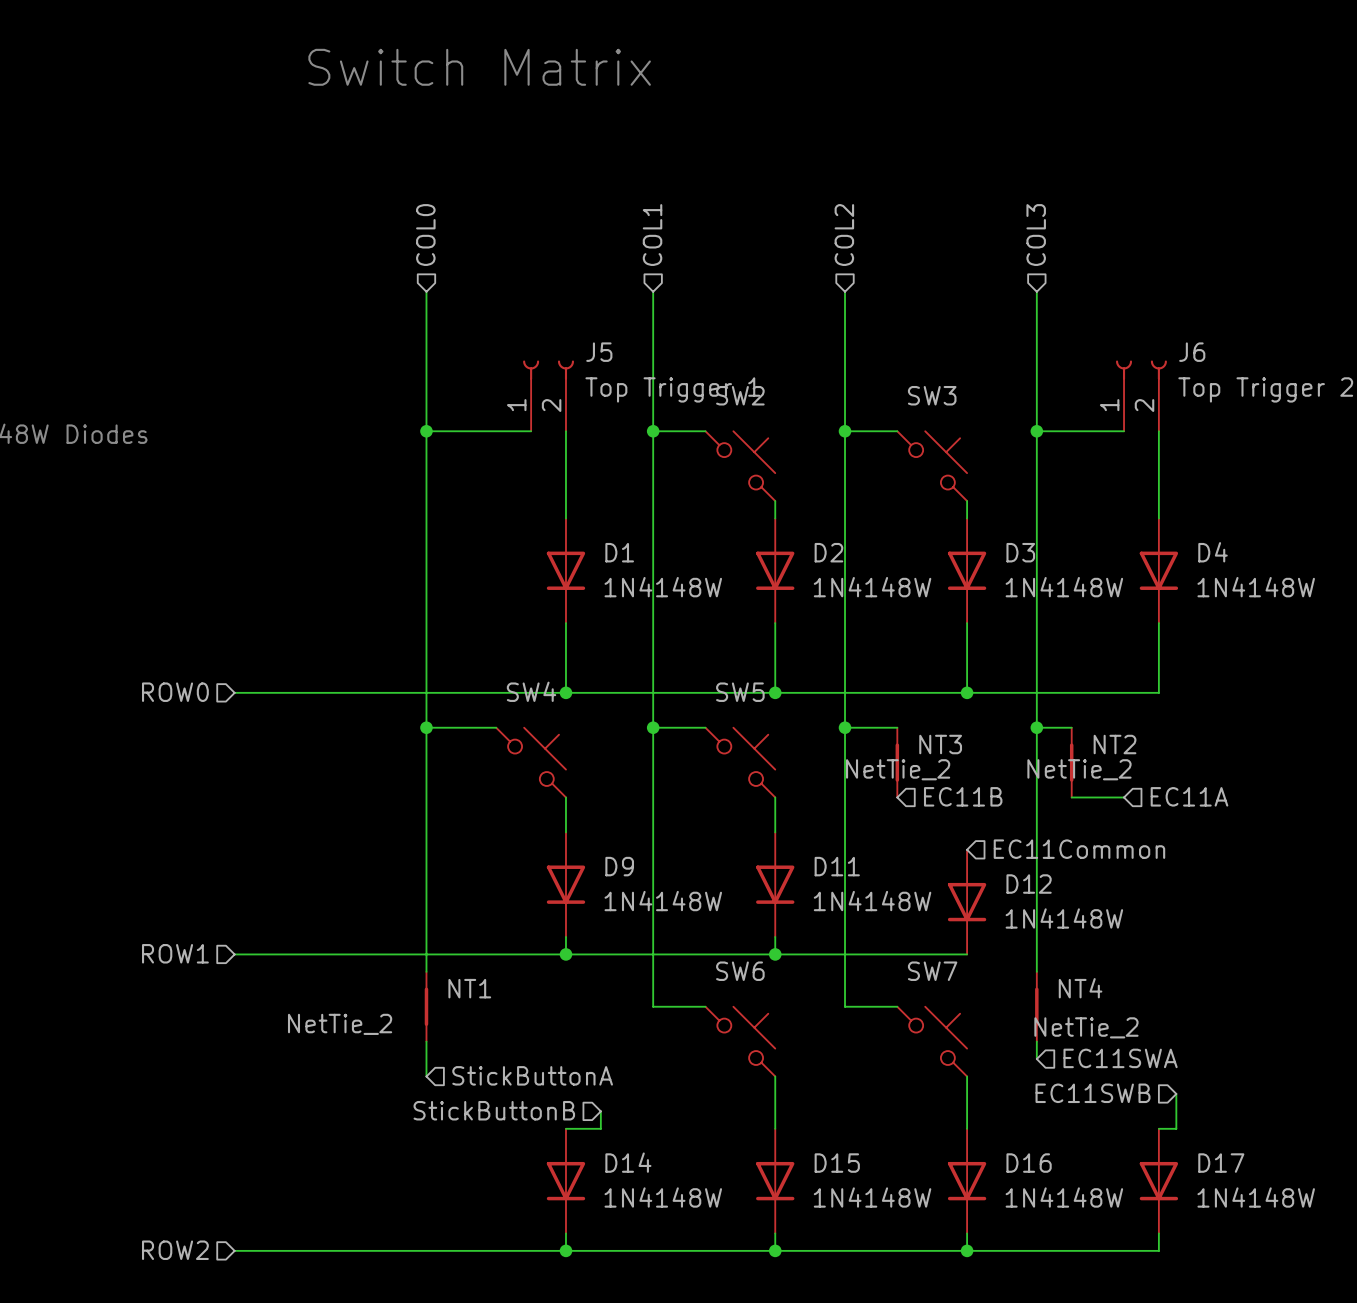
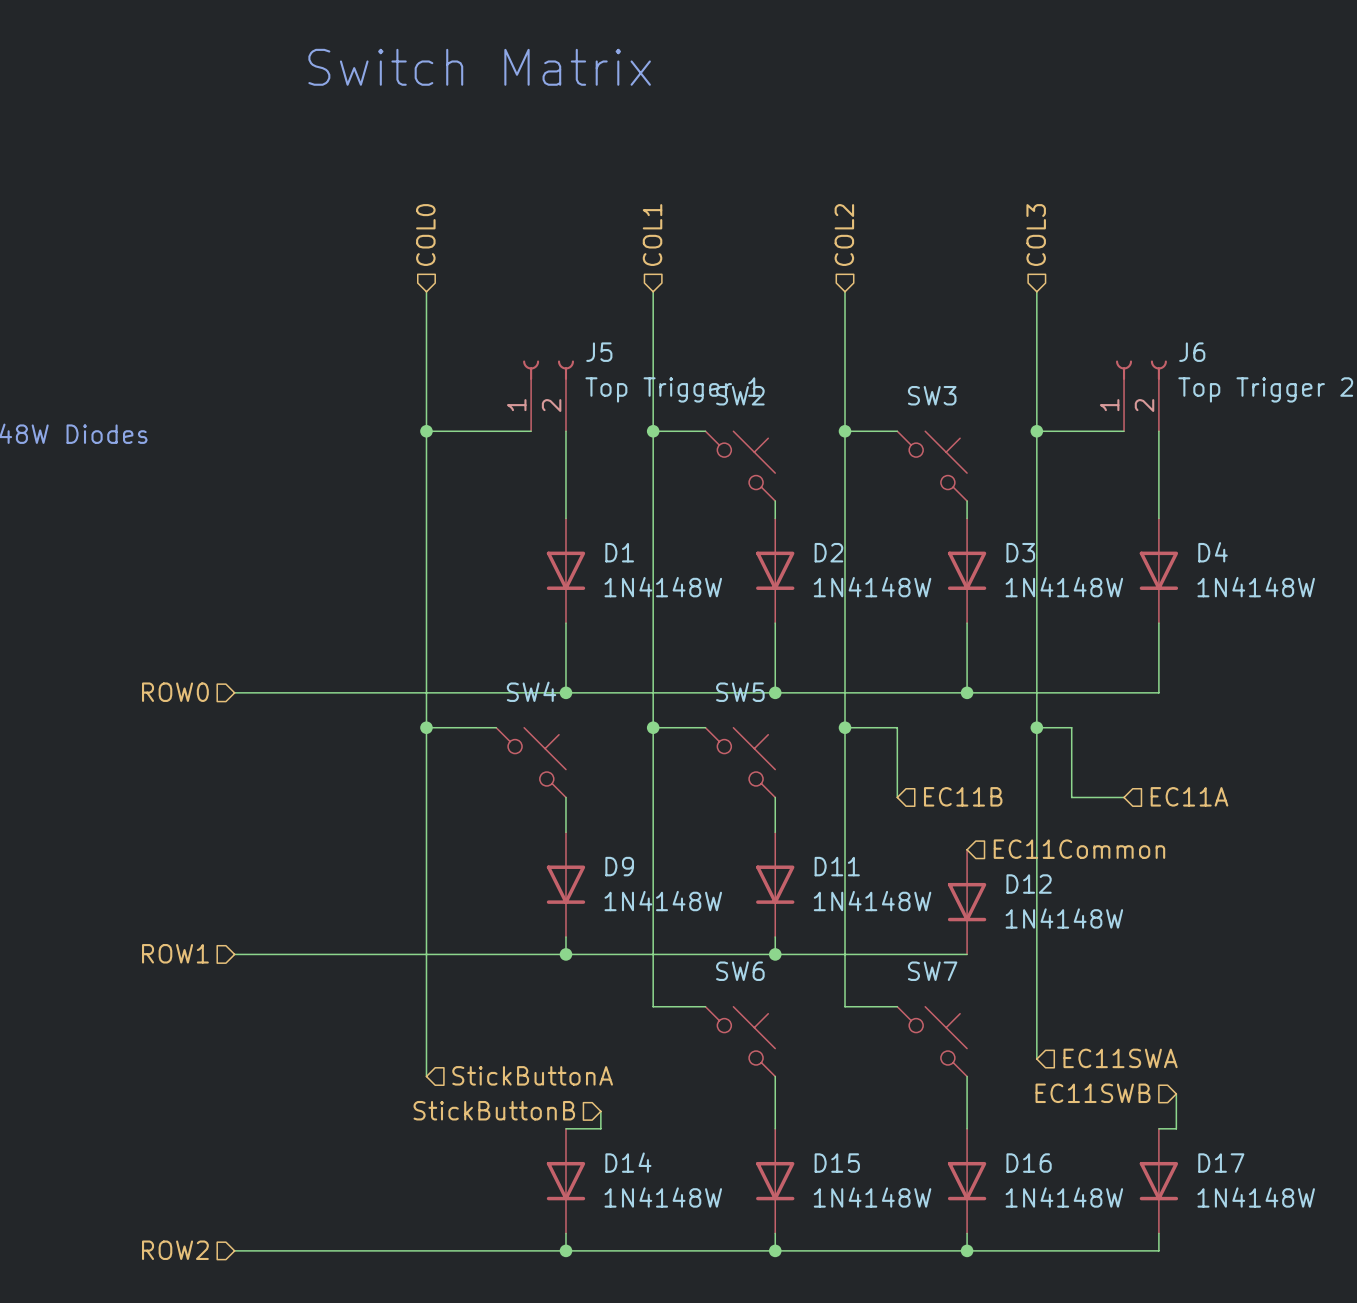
NT3: NetTie_2 (897, 762) -> none
NT2: NetTie_2 (1071, 762) -> none
NT1: NetTie_2 (426, 1006) -> none
NT4: NetTie_2 (1036, 1006) -> none

